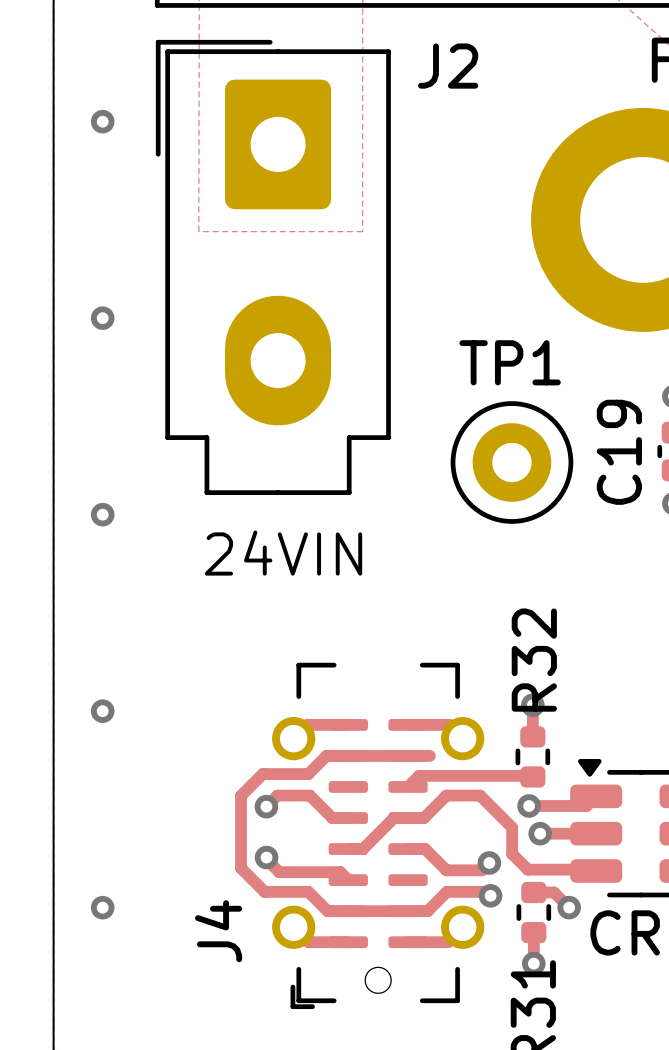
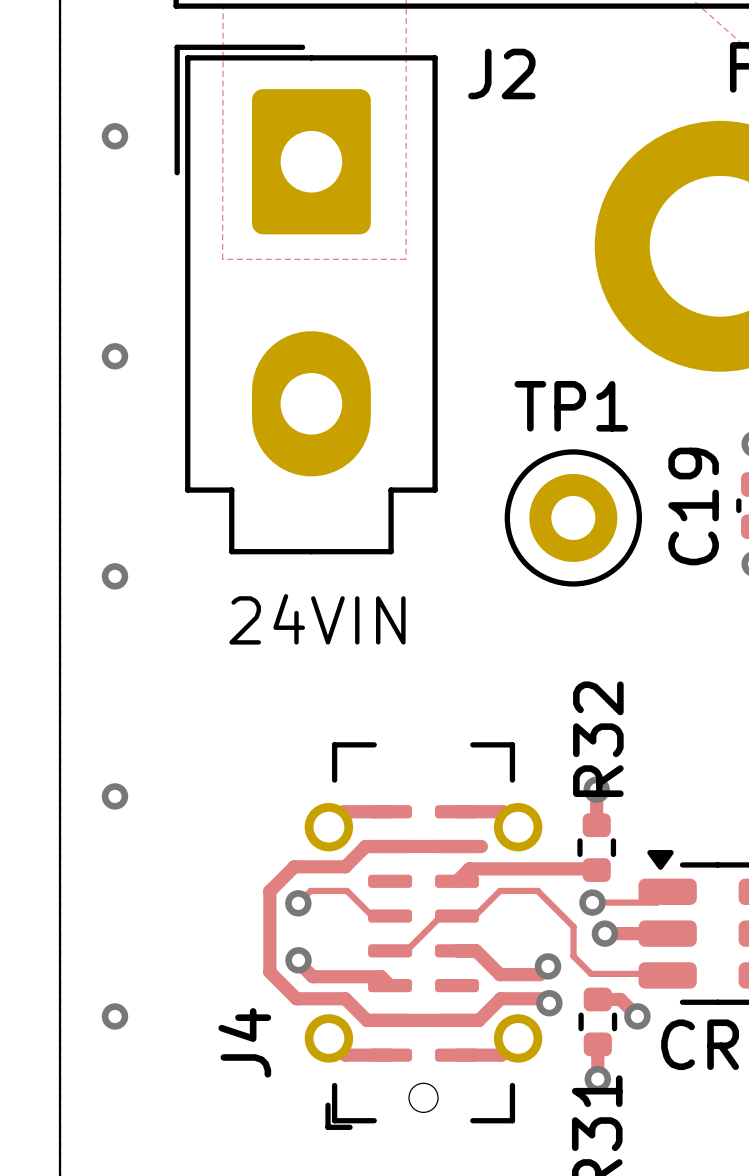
track width: thick (596, 796) (586, 805) (529, 805) -> thin (667, 891) (656, 902) (592, 902)
track width: thick (266, 806) (277, 795) (309, 795) (332, 818) (348, 818) -> thin (298, 903) (310, 890) (347, 890) (372, 916) (390, 916)
track width: thick (348, 849) (362, 849) (394, 818) (424, 818) (446, 795) (480, 795) (512, 827) (512, 853) (527, 869) (594, 869) -> thin (390, 950) (406, 950) (441, 916) (474, 916) (499, 890) (537, 890) (573, 926) (573, 956) (591, 973) (666, 973)

